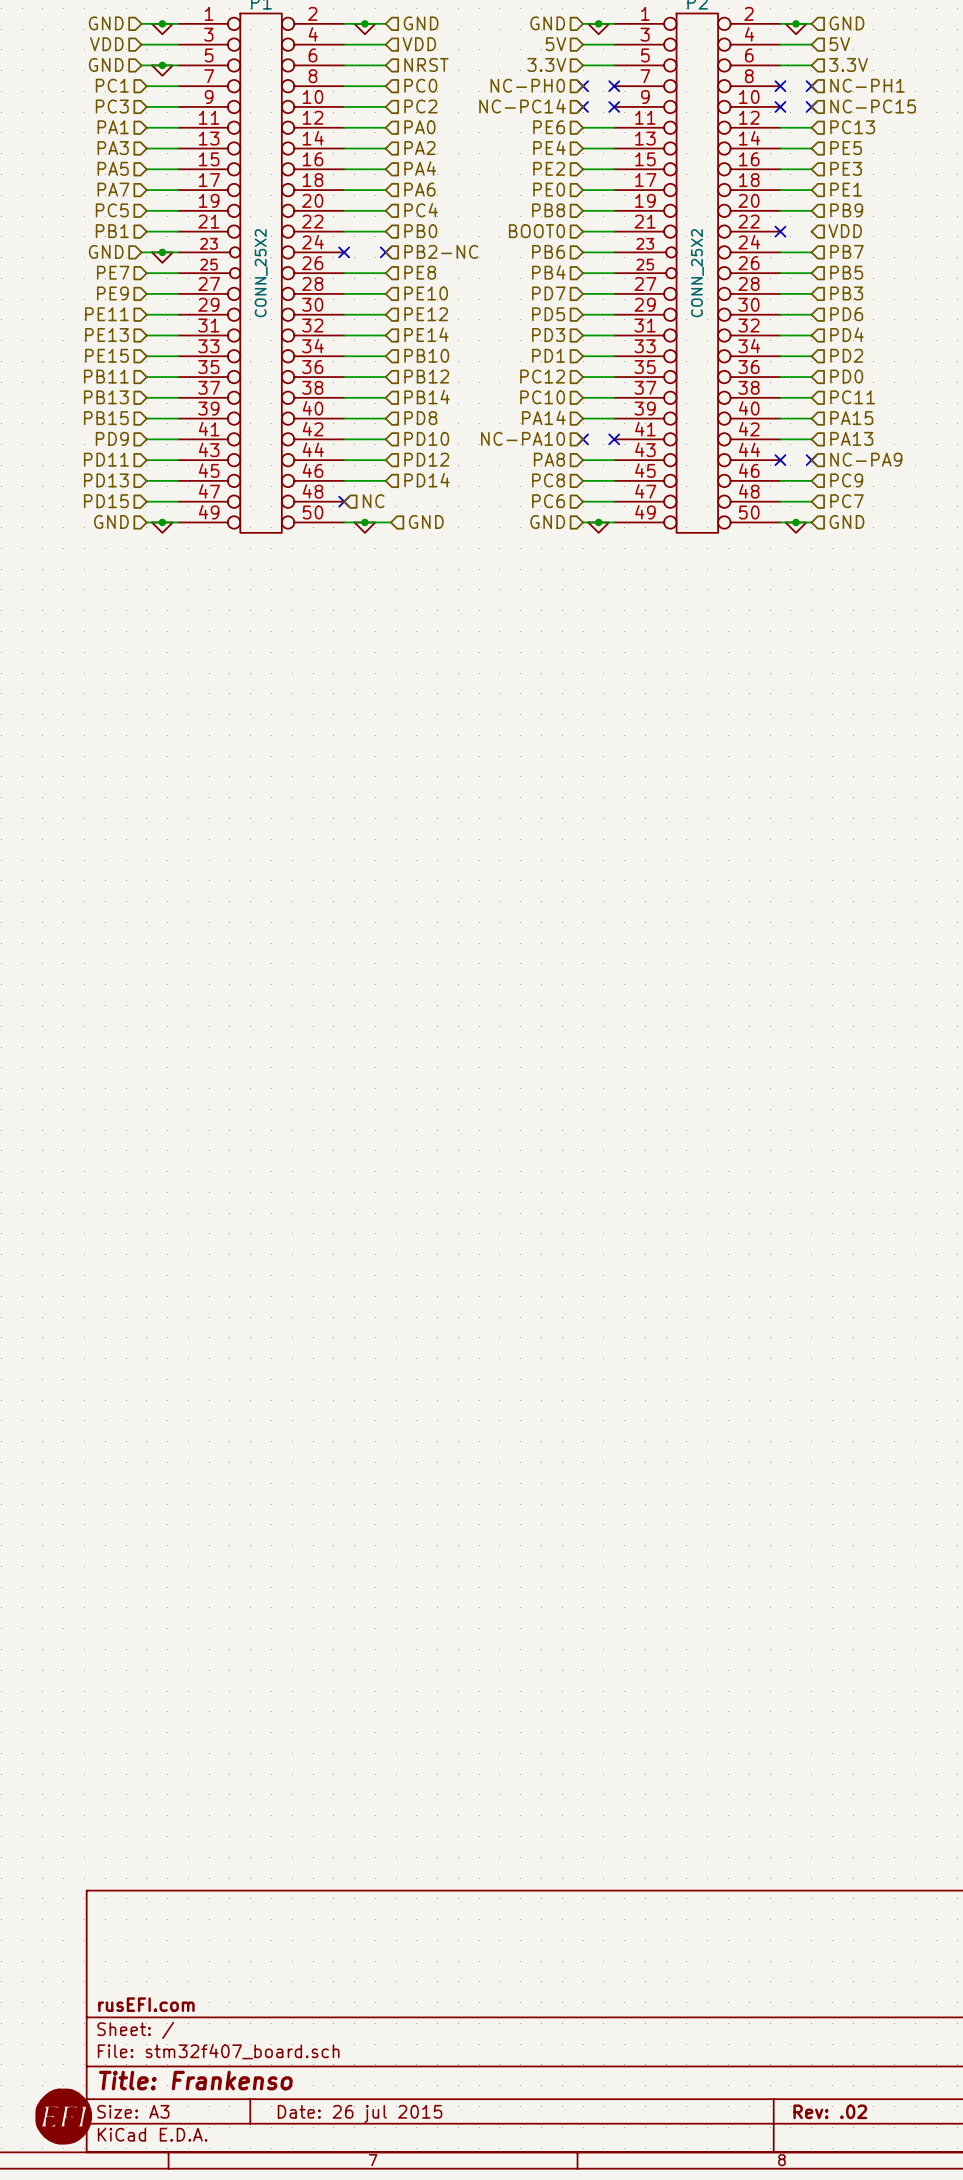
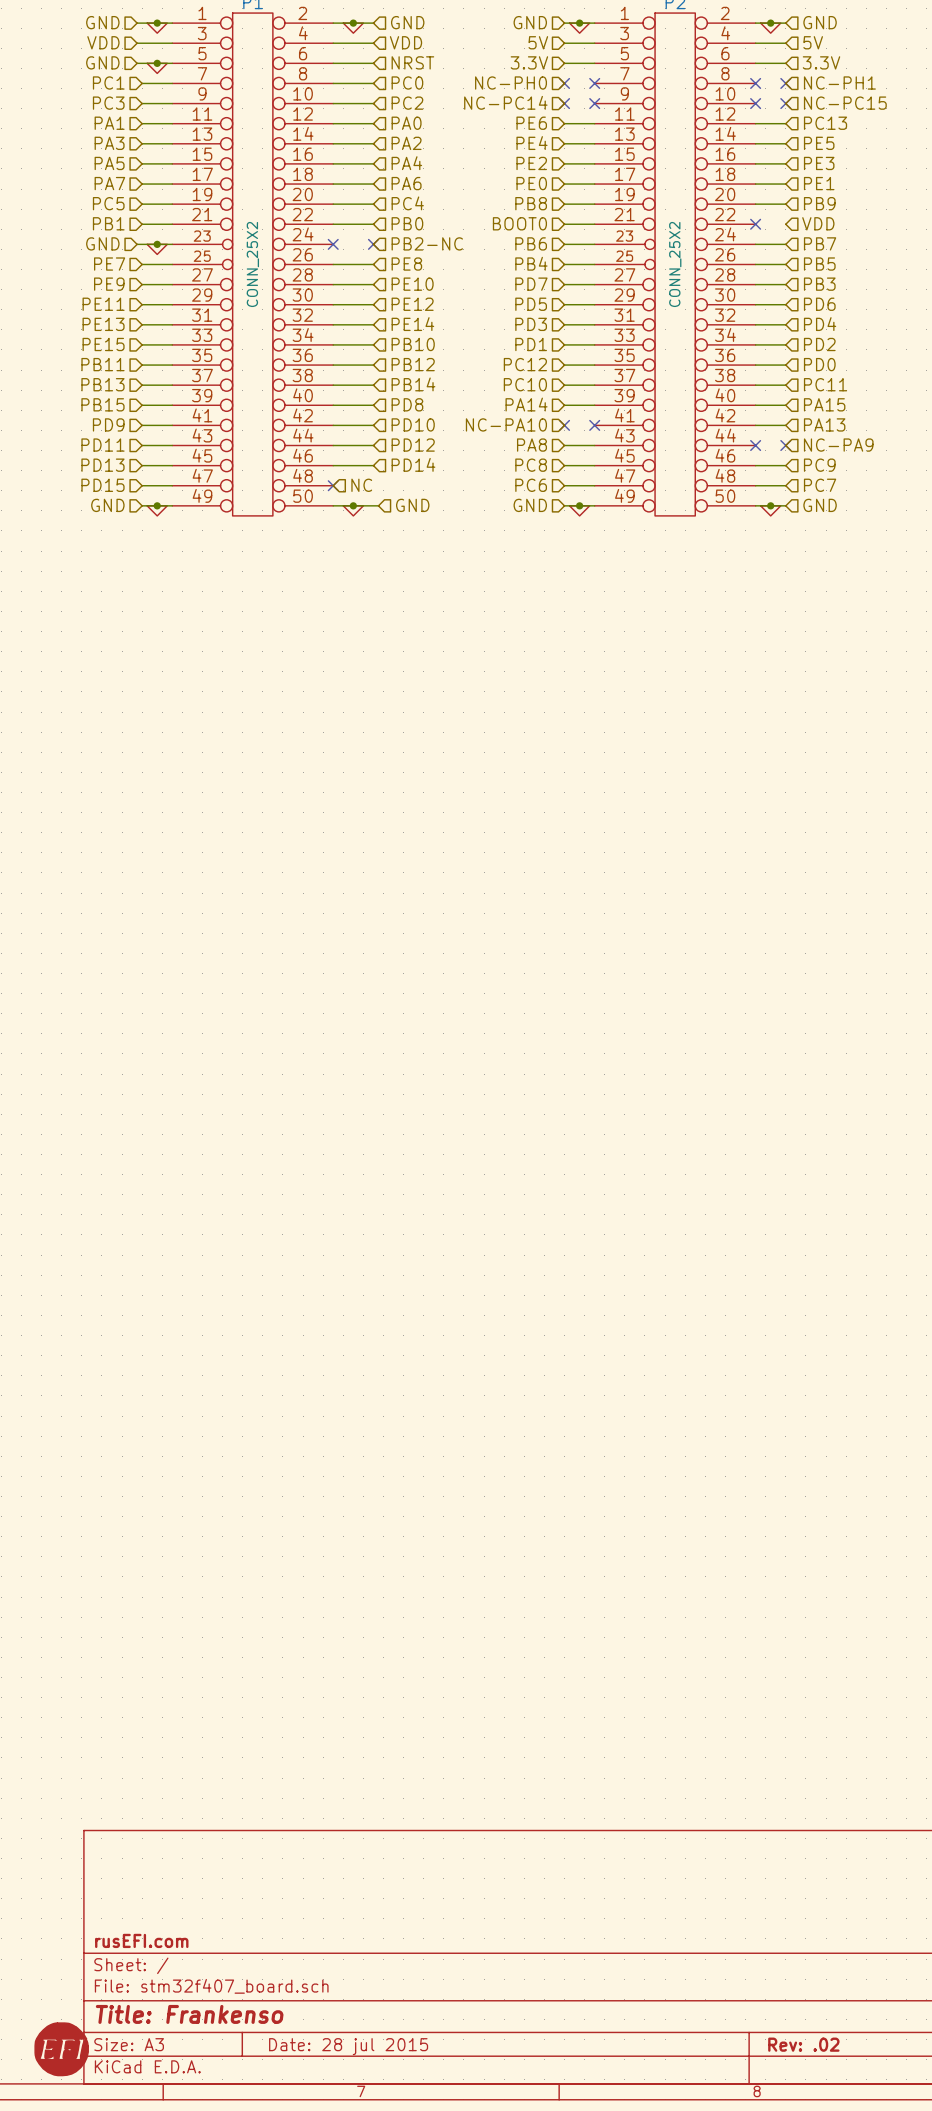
title block: Date: 26 jul 2015 (360, 2113) -> Date: 28 jul 2015 (348, 2046)

